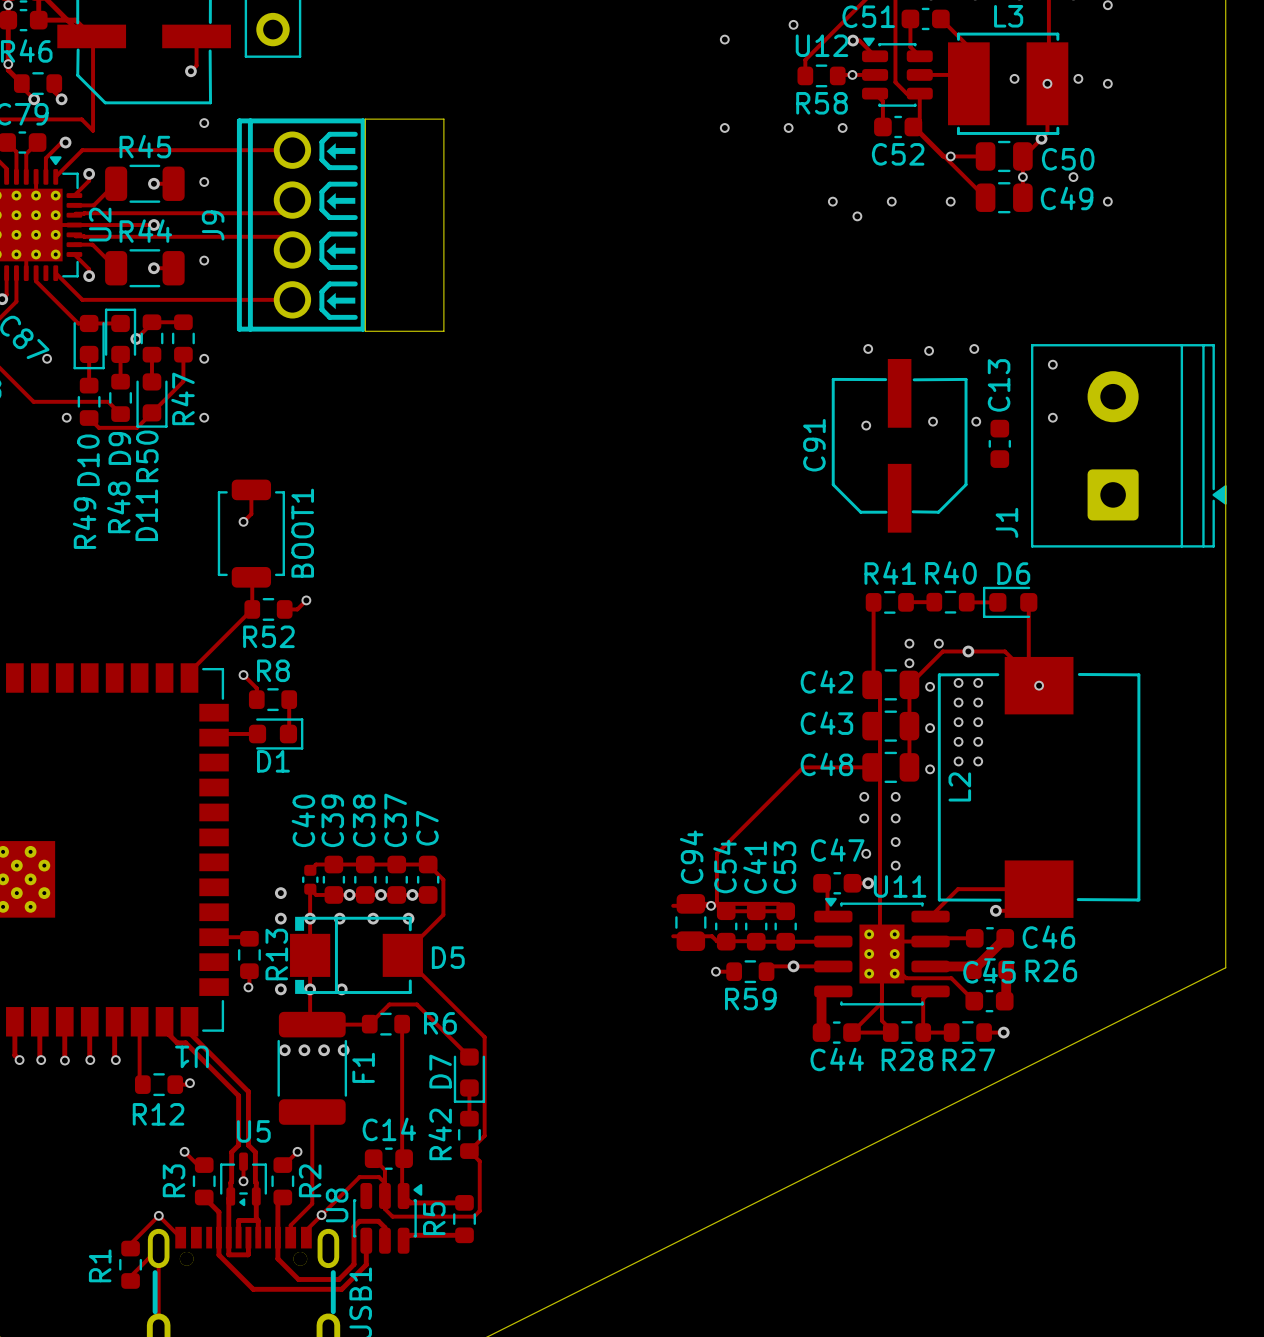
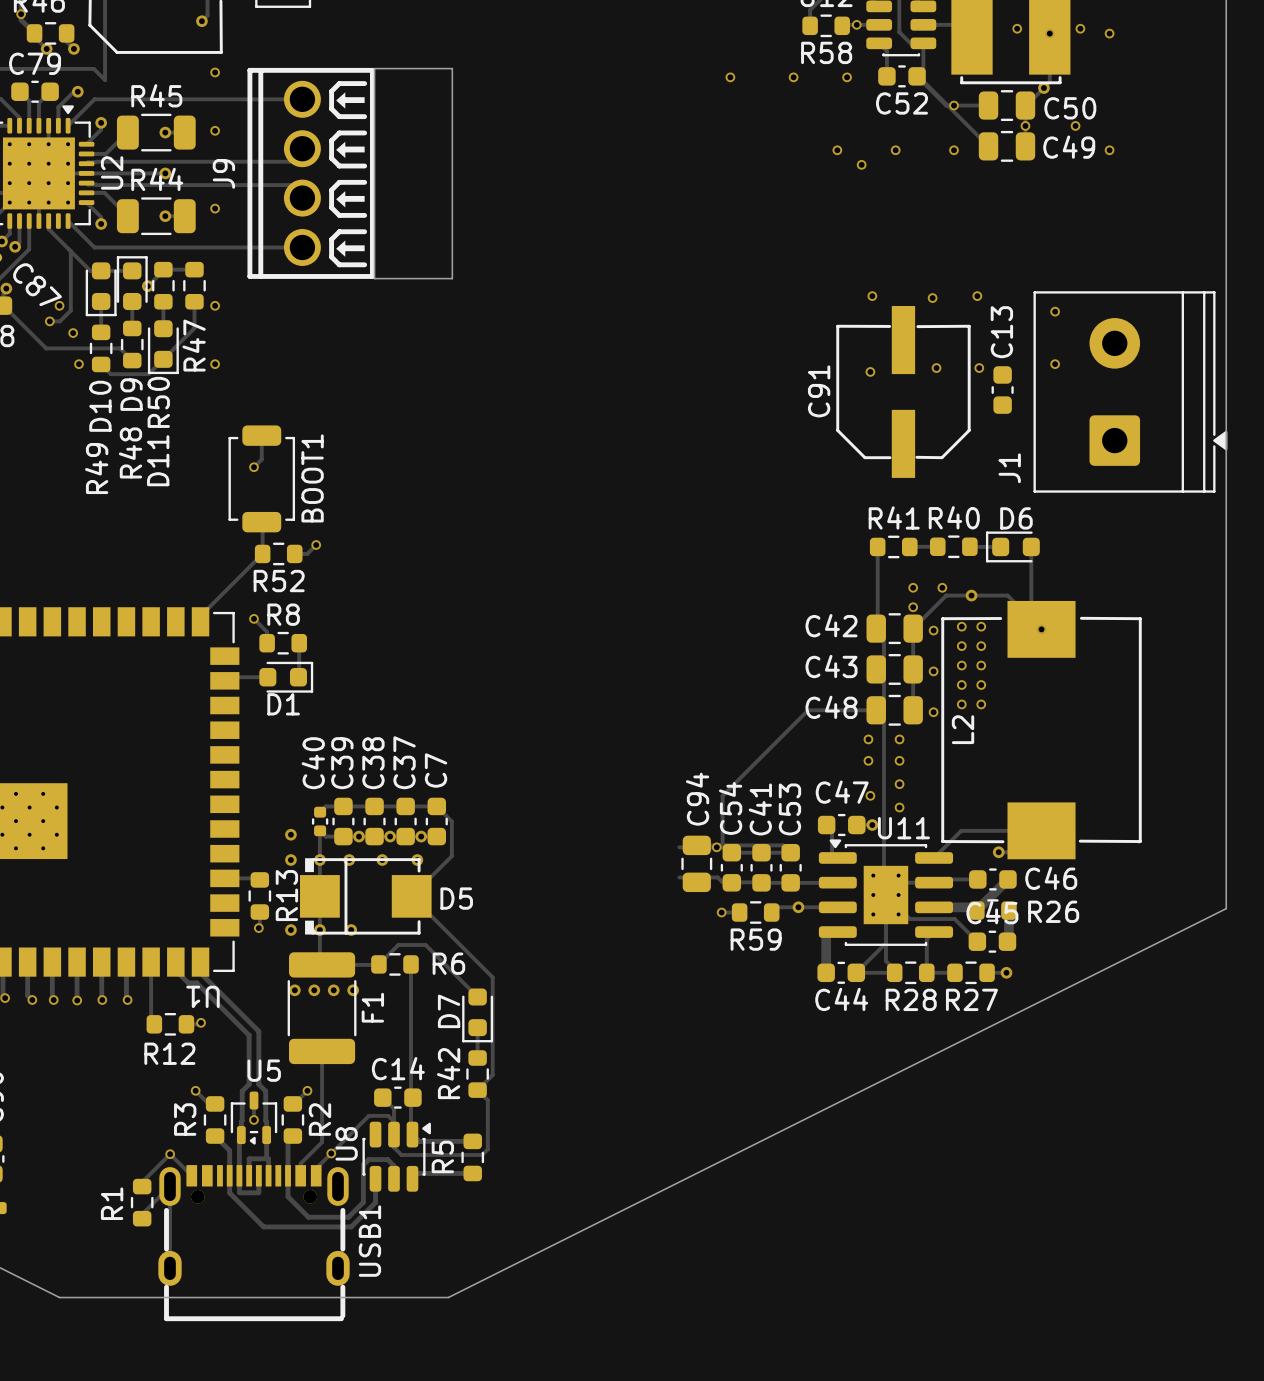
track: none -> (70, 251) (70, 310) (59, 321) (49, 321)
via: none -> (49, 321)
via: none -> (73, 333)

